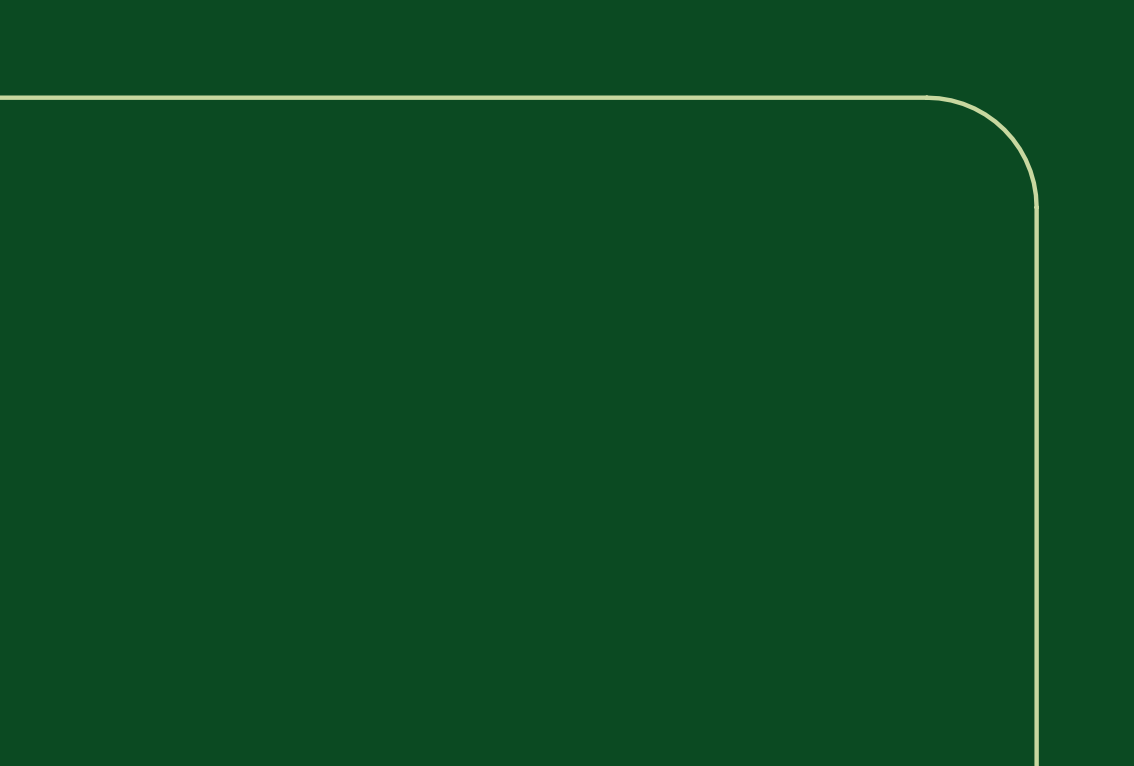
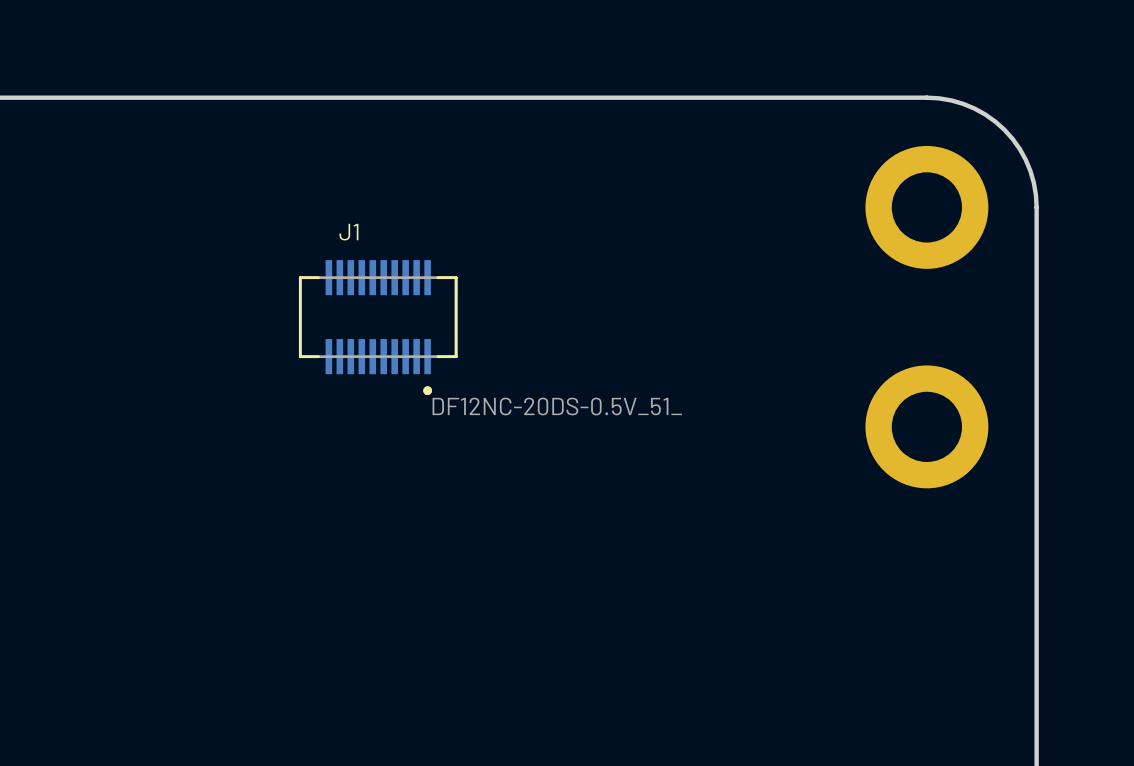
part: none -> (926, 207)
J1: none -> DF12NC-20DS-0.5V_51_ (378, 327)
part: none -> (926, 426)

